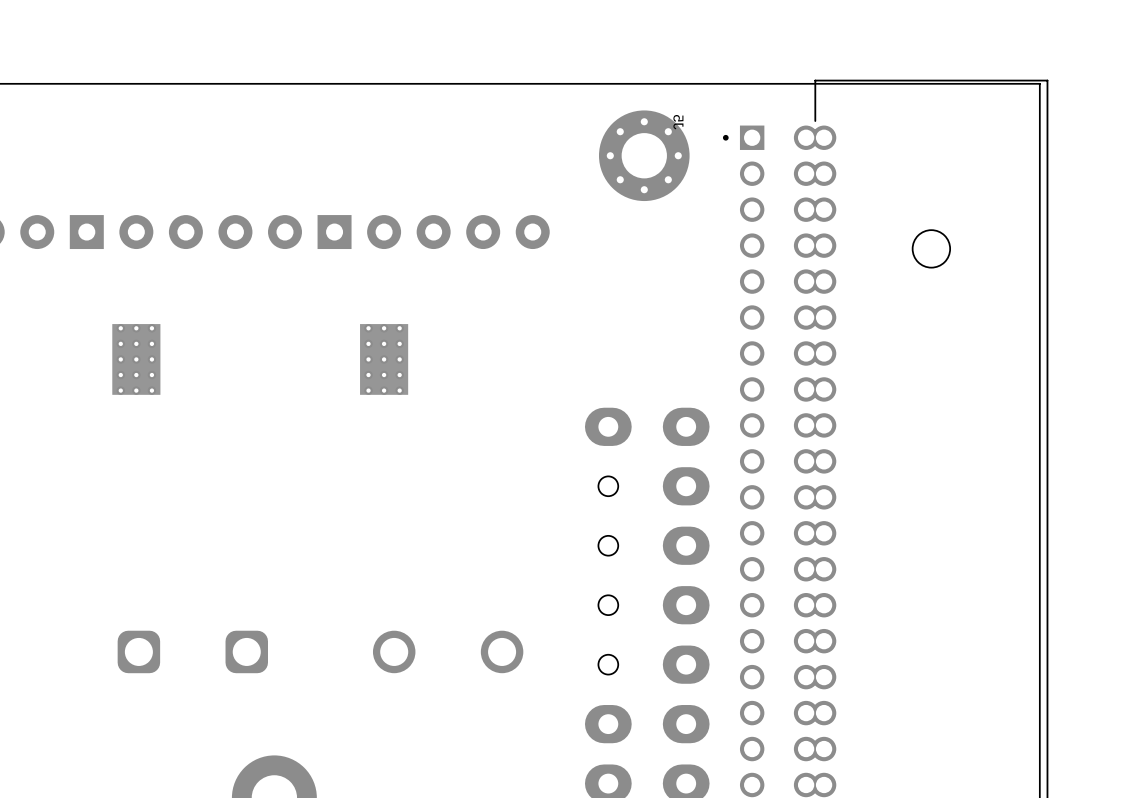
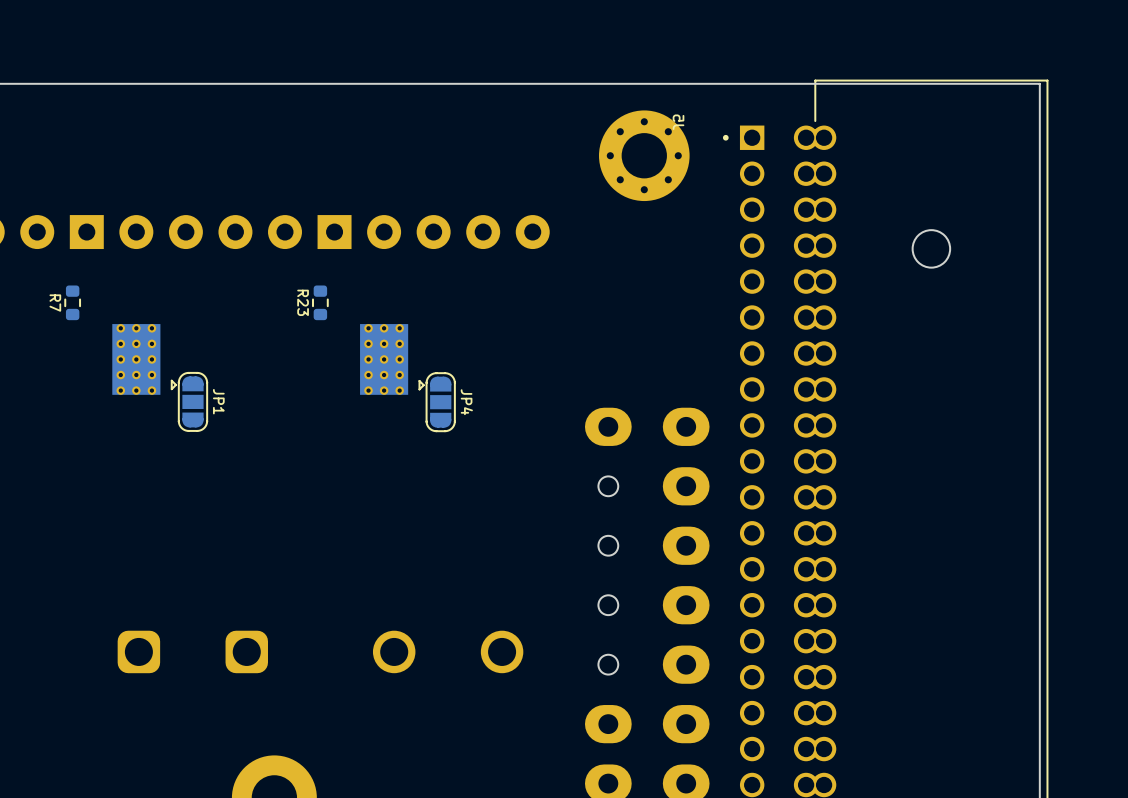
R7: none -> (72, 302)
R23: none -> (320, 302)
JP1: none -> (189, 401)
JP4: none -> (437, 402)

